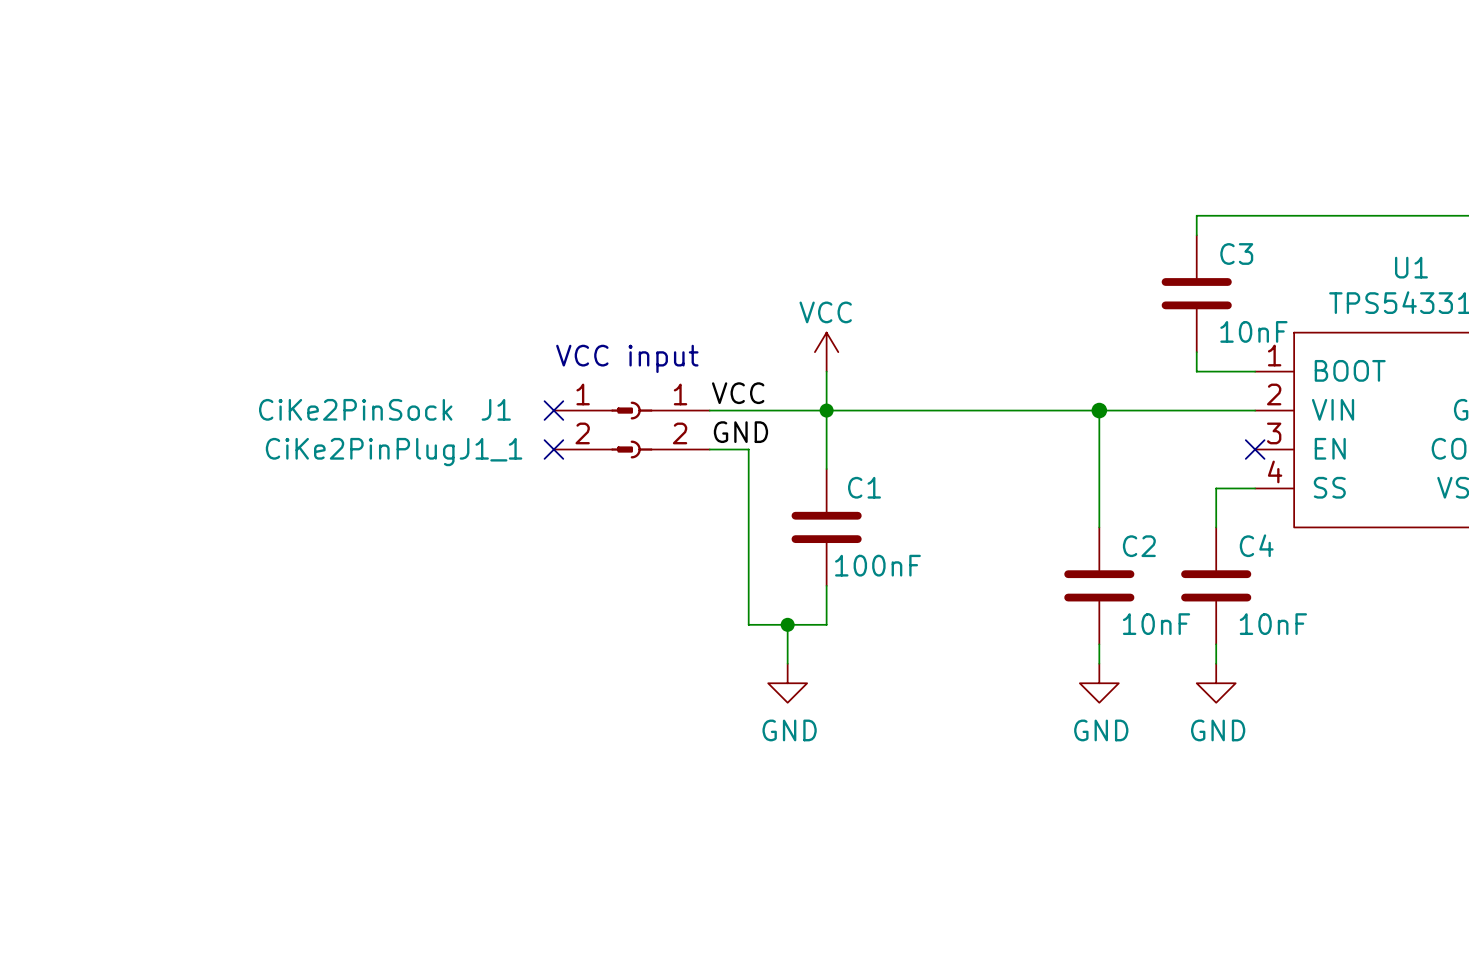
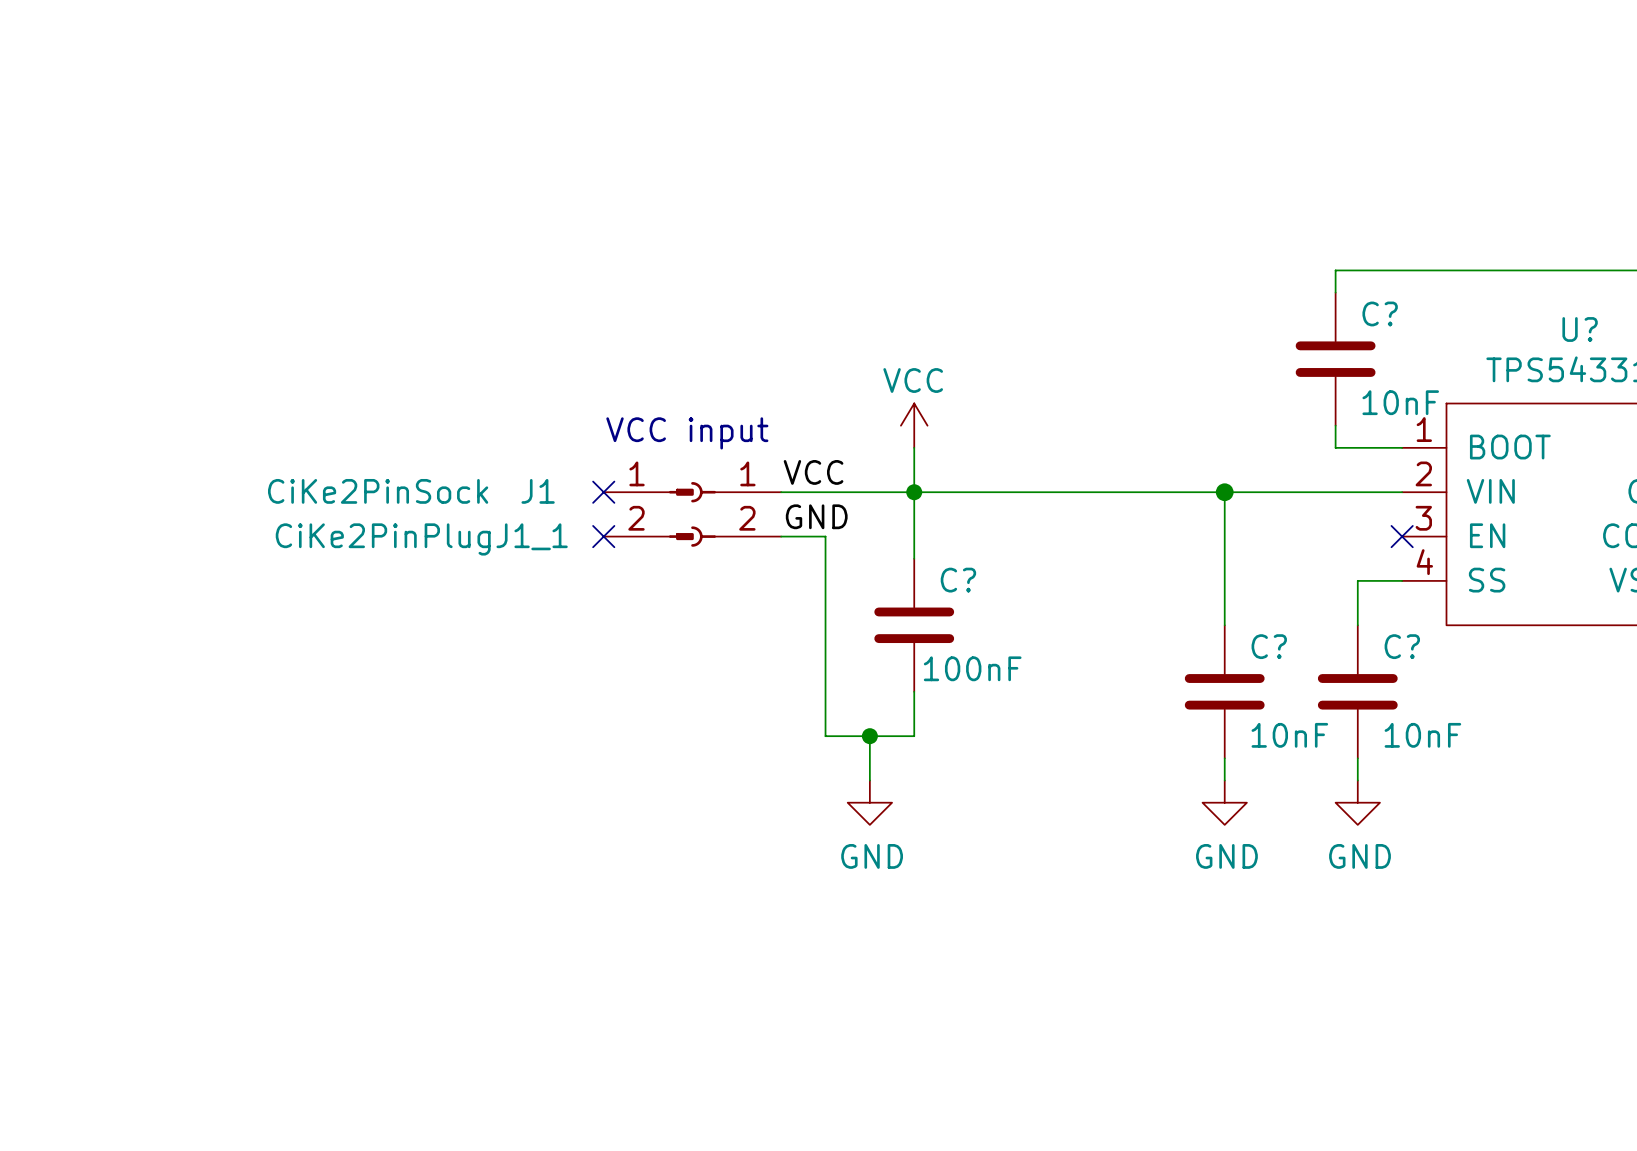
C3 name: C3 (1236, 253) -> C? (1380, 313)
U1 name: U1 (1411, 267) -> U? (1580, 329)
C1 name: C1 (864, 487) -> C? (958, 580)
C4 name: C4 (1256, 545) -> C? (1402, 646)
C2 name: C2 (1139, 546) -> C? (1269, 646)

